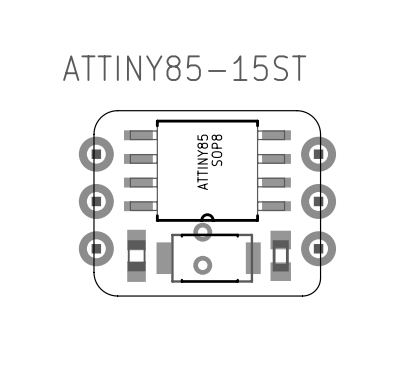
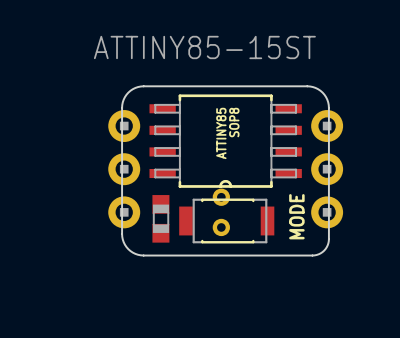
text: none -> MODE (296, 216)
part: (280, 255) -> none

